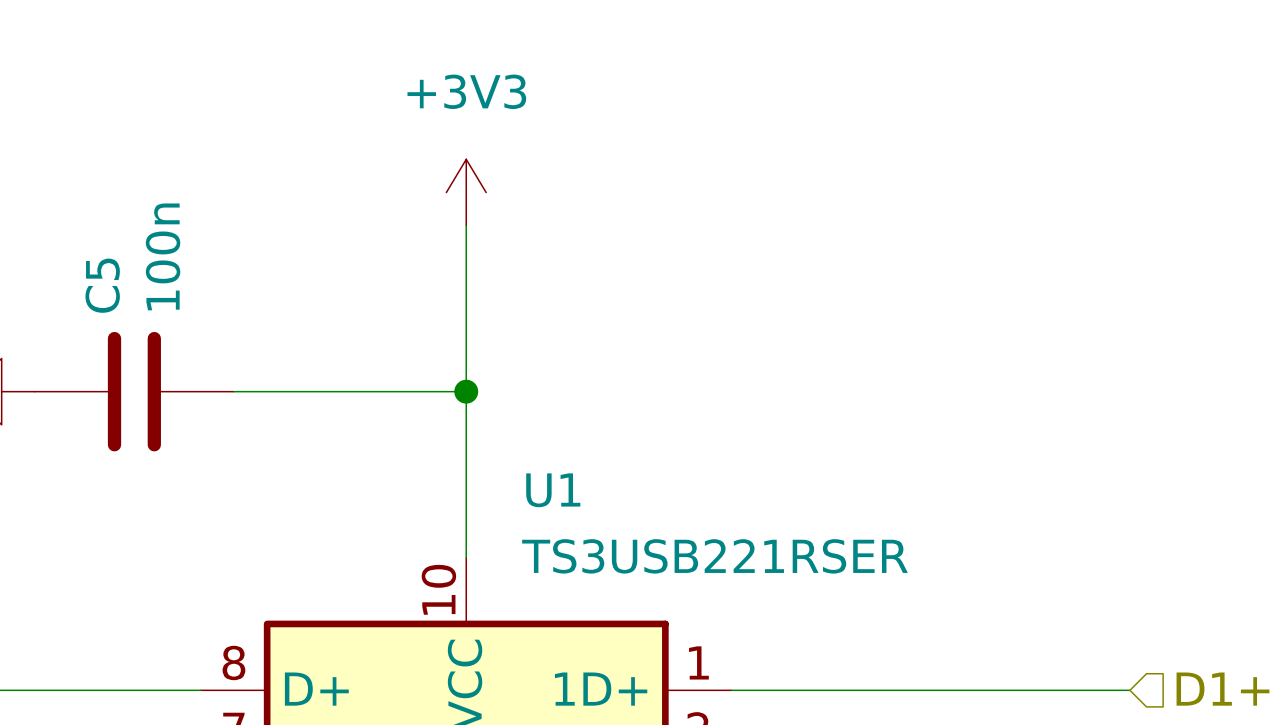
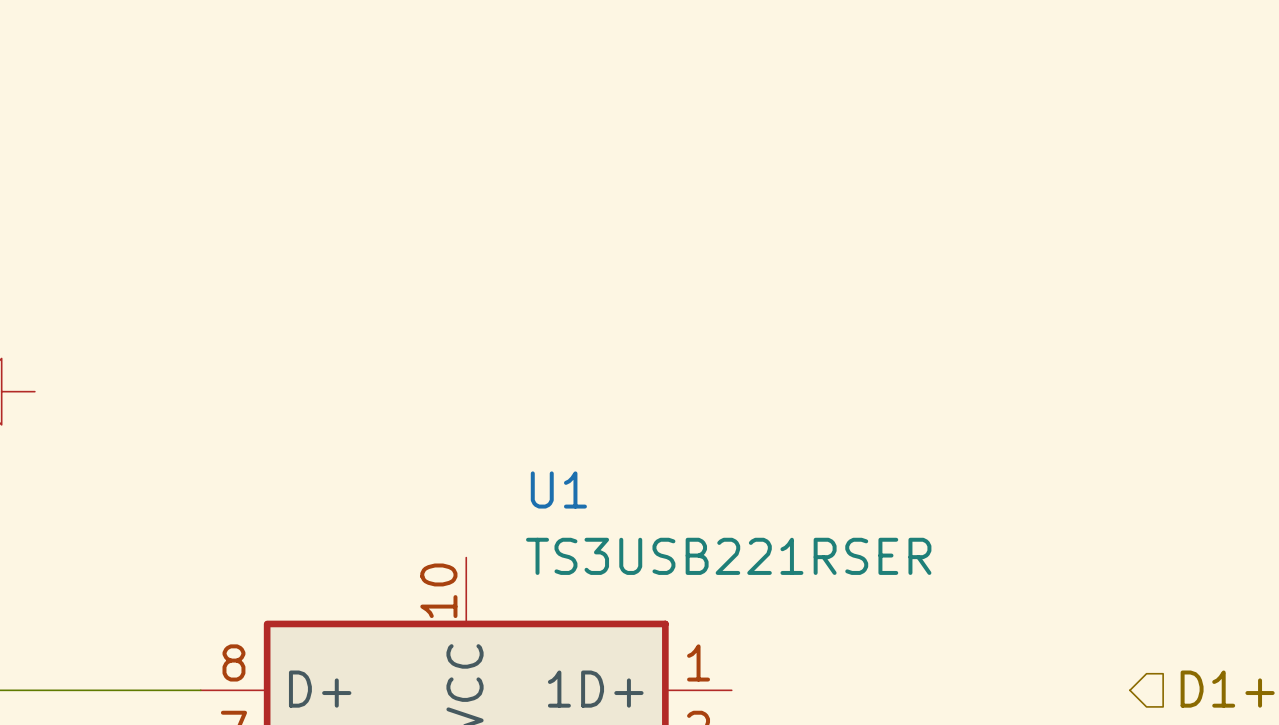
power symbol: +3V3 (466, 192) -> none
wire: (466, 225) (466, 557) -> none
C5: 100n (134, 391) -> none
wire: (233, 391) (466, 391) -> none
junction: (466, 391) -> none
wire: (731, 690) (1129, 690) -> none

